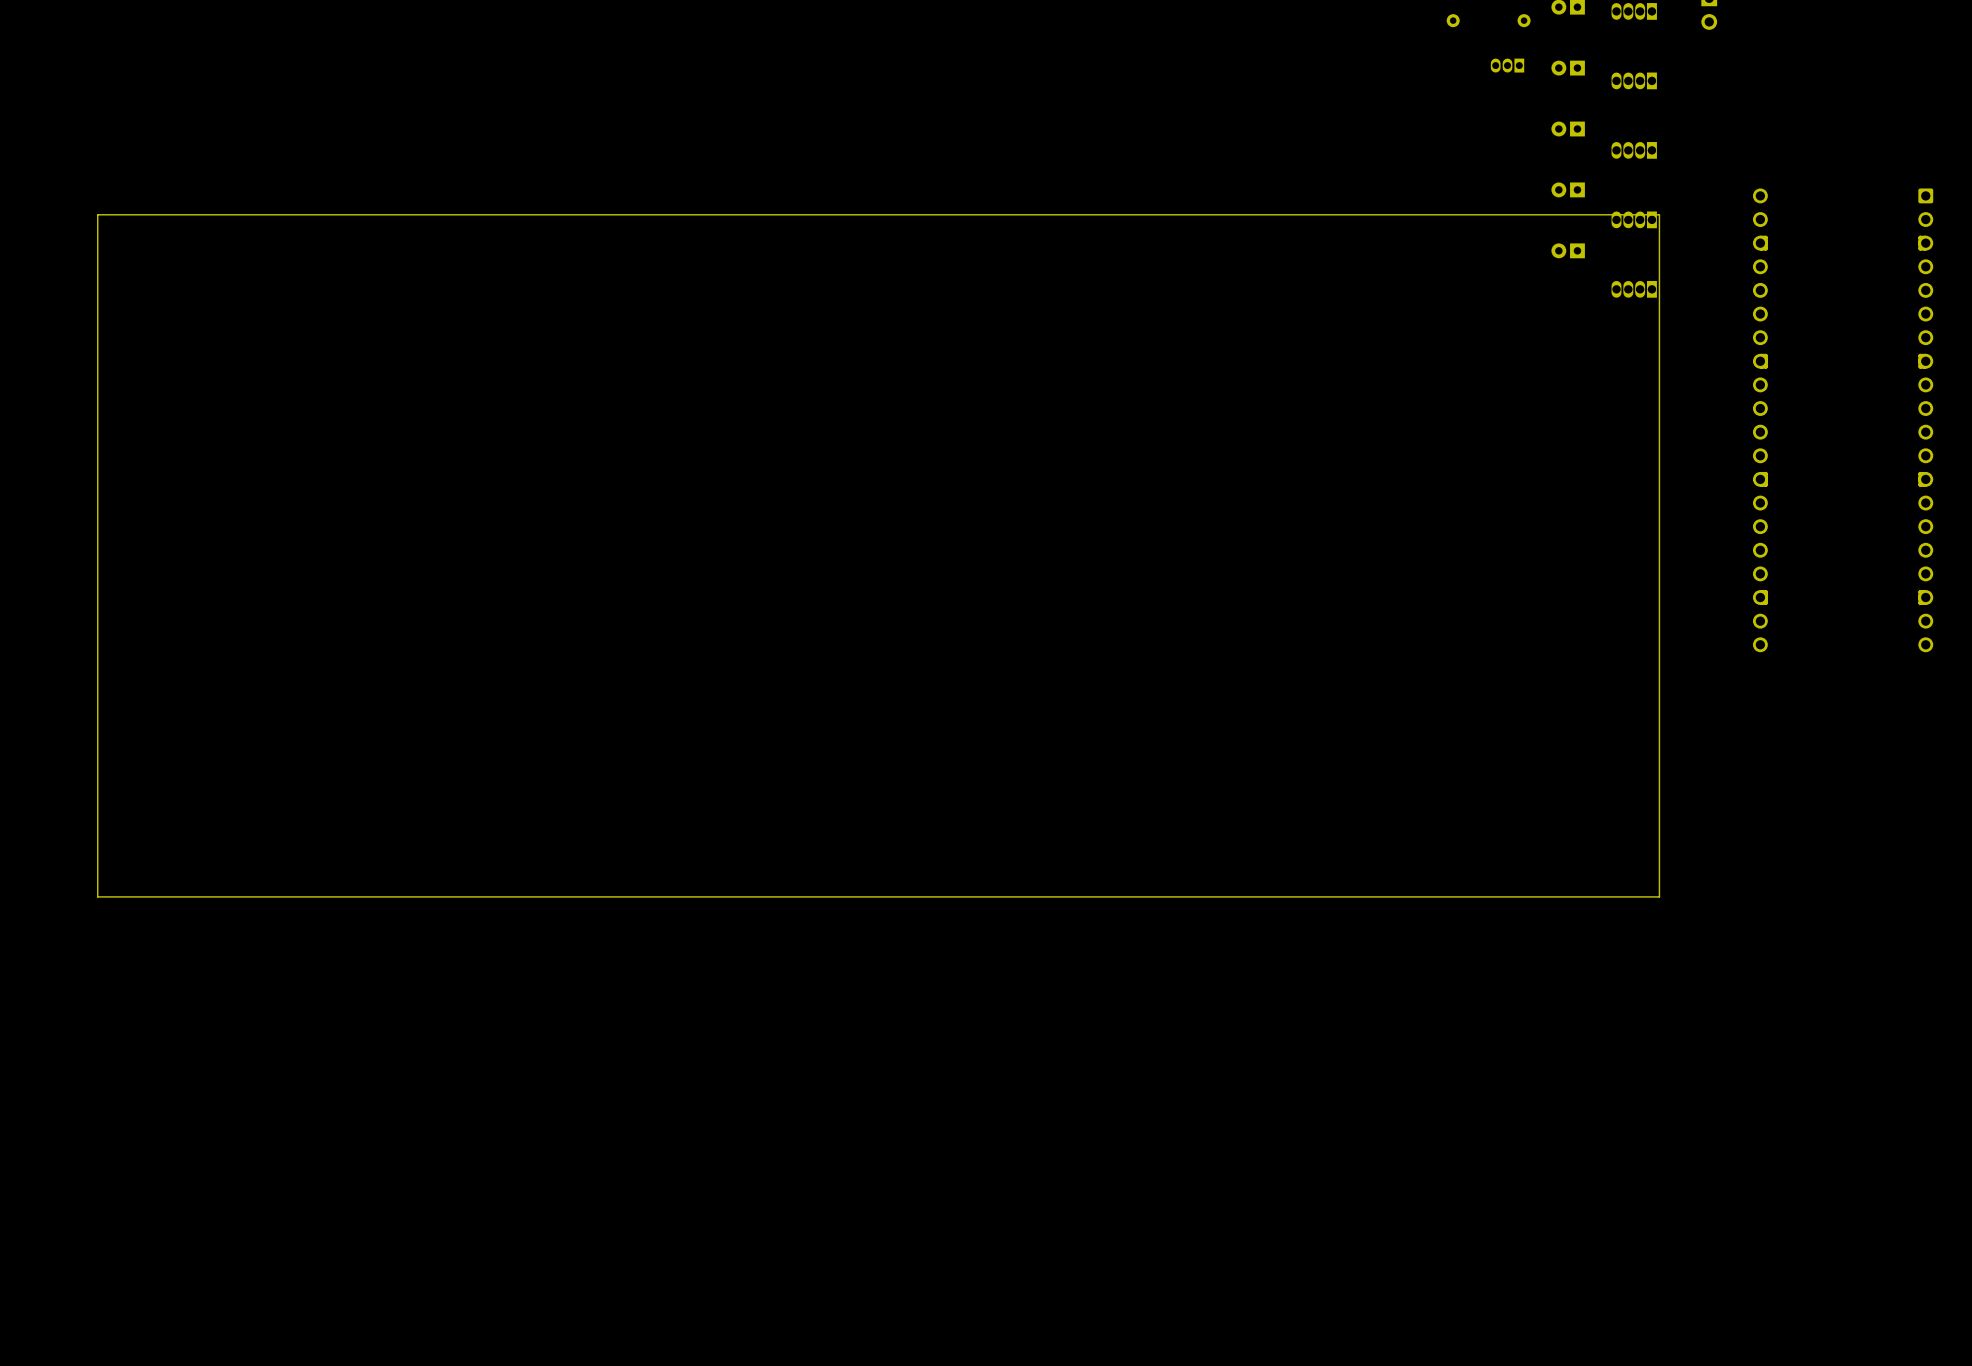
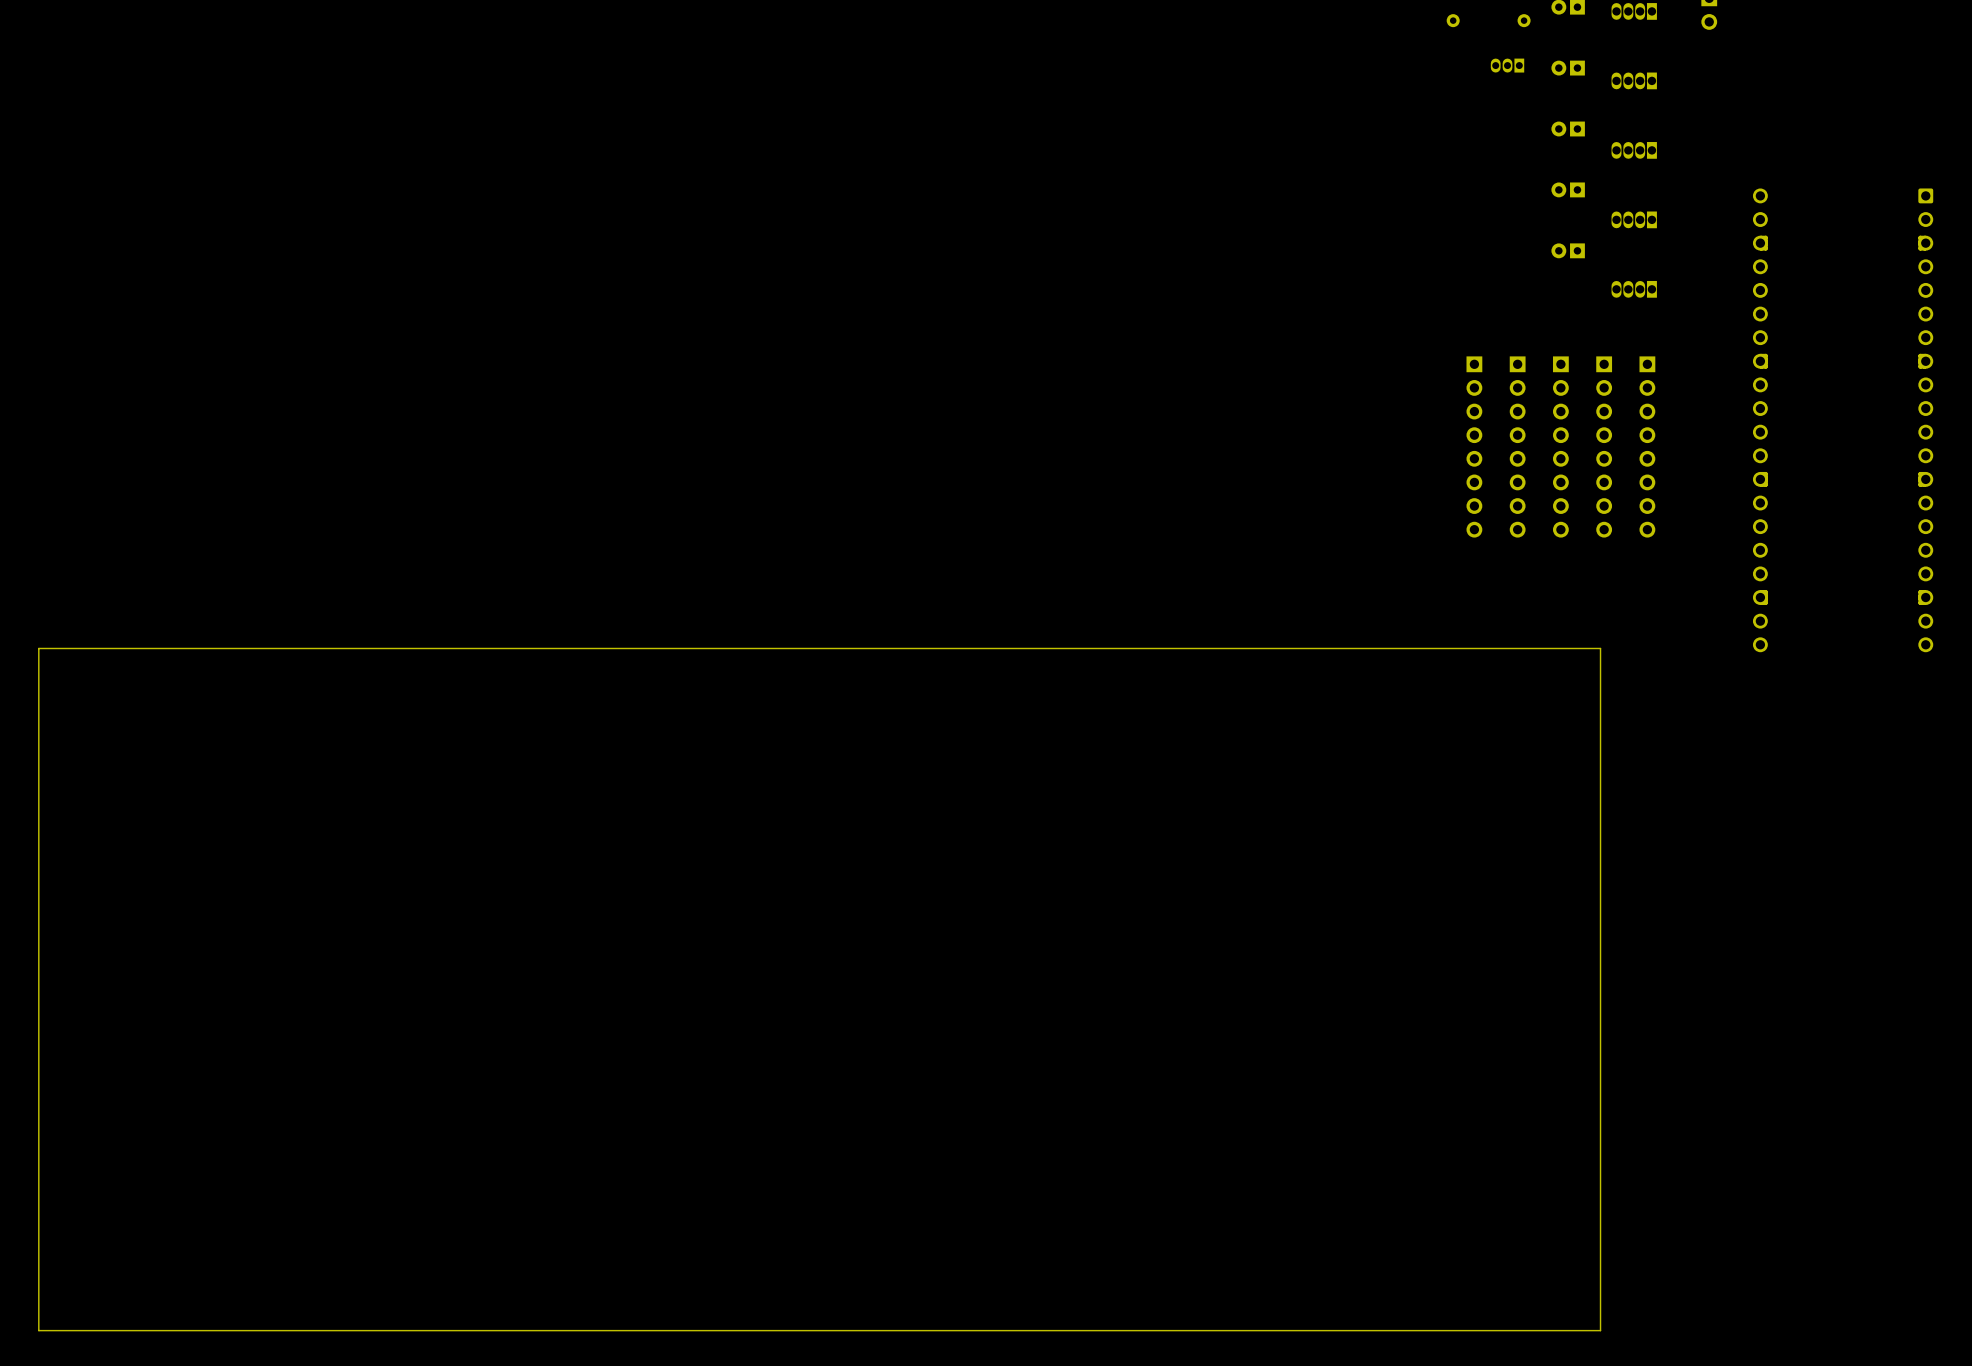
board edge: (1659, 214) (97, 214) (97, 896) (1659, 896) (1659, 214) -> none
part: none -> (1474, 446)
part: none -> (1517, 446)
part: none -> (1560, 446)
part: none -> (1604, 446)
part: none -> (1647, 446)
board edge: none -> (1600, 648) (38, 648) (38, 1330) (1600, 1330) (1600, 648)

